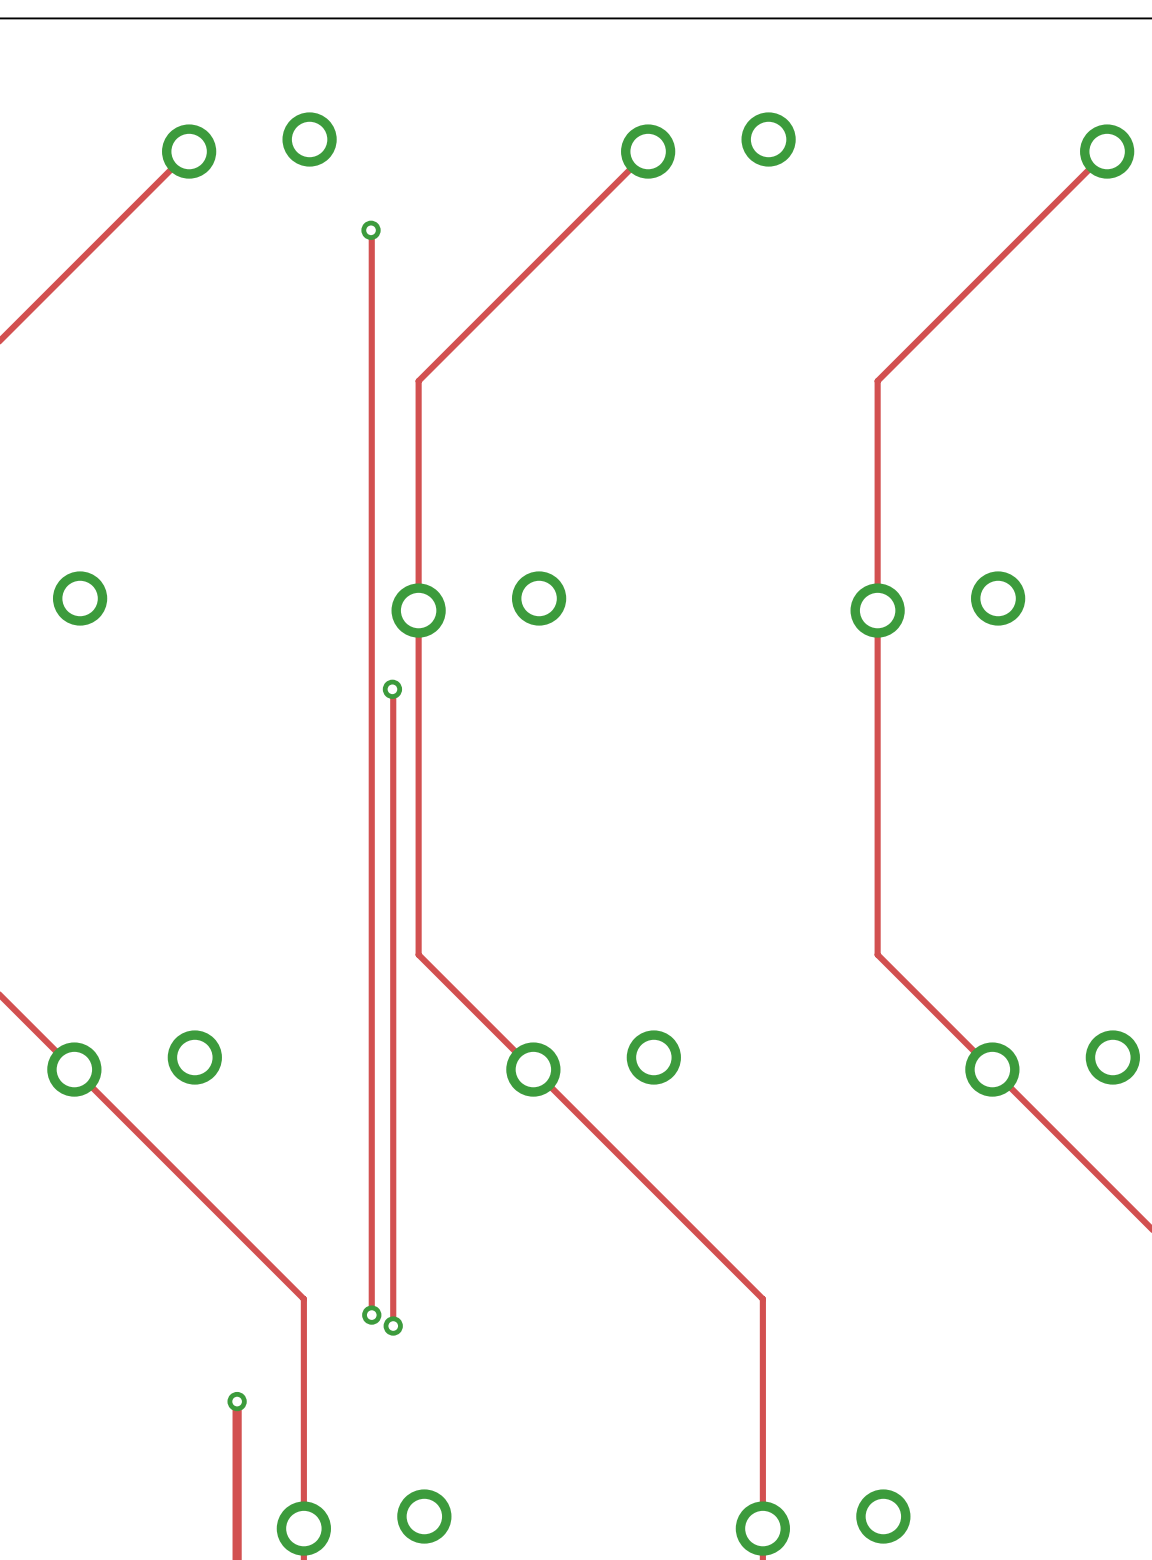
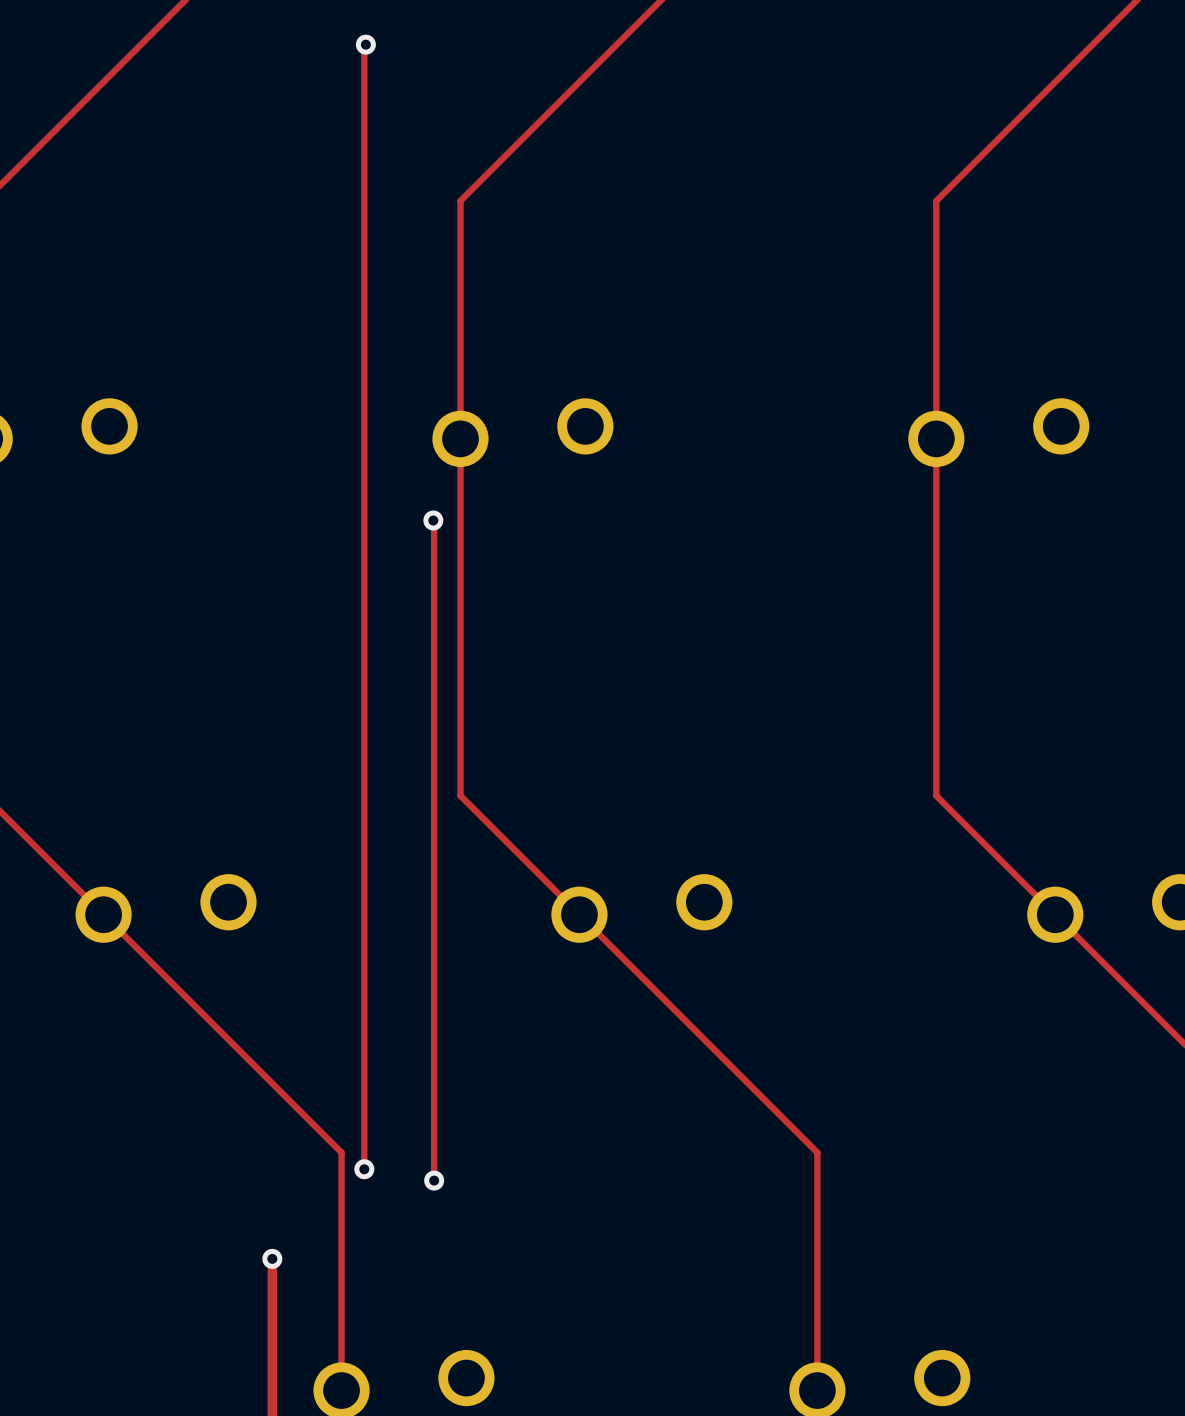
track: none -> (365, 44) (364, 46) (364, 1169)
track: (371, 230) (371, 1315) -> none
via position: (371, 230) -> (365, 44)
via position: (371, 1315) -> (364, 1169)

